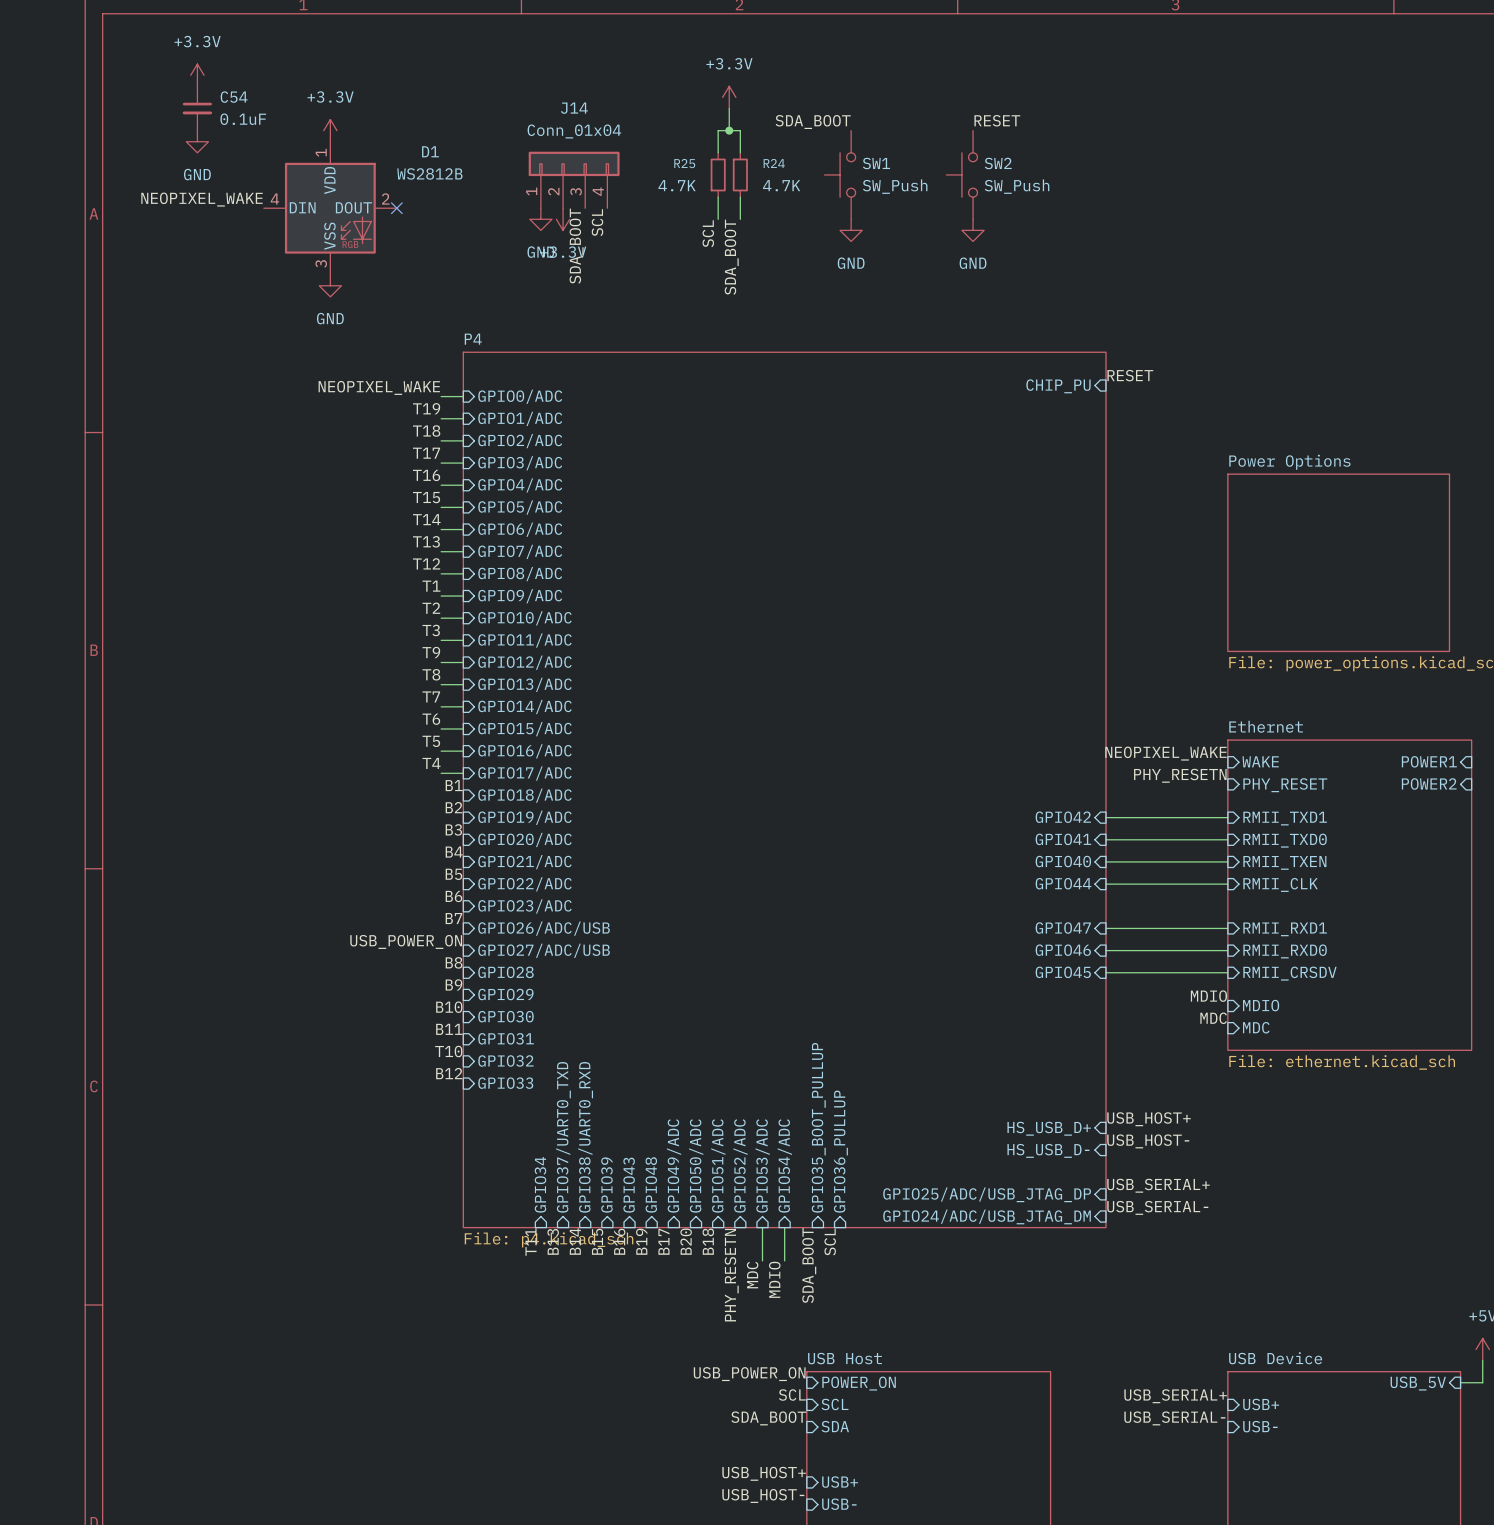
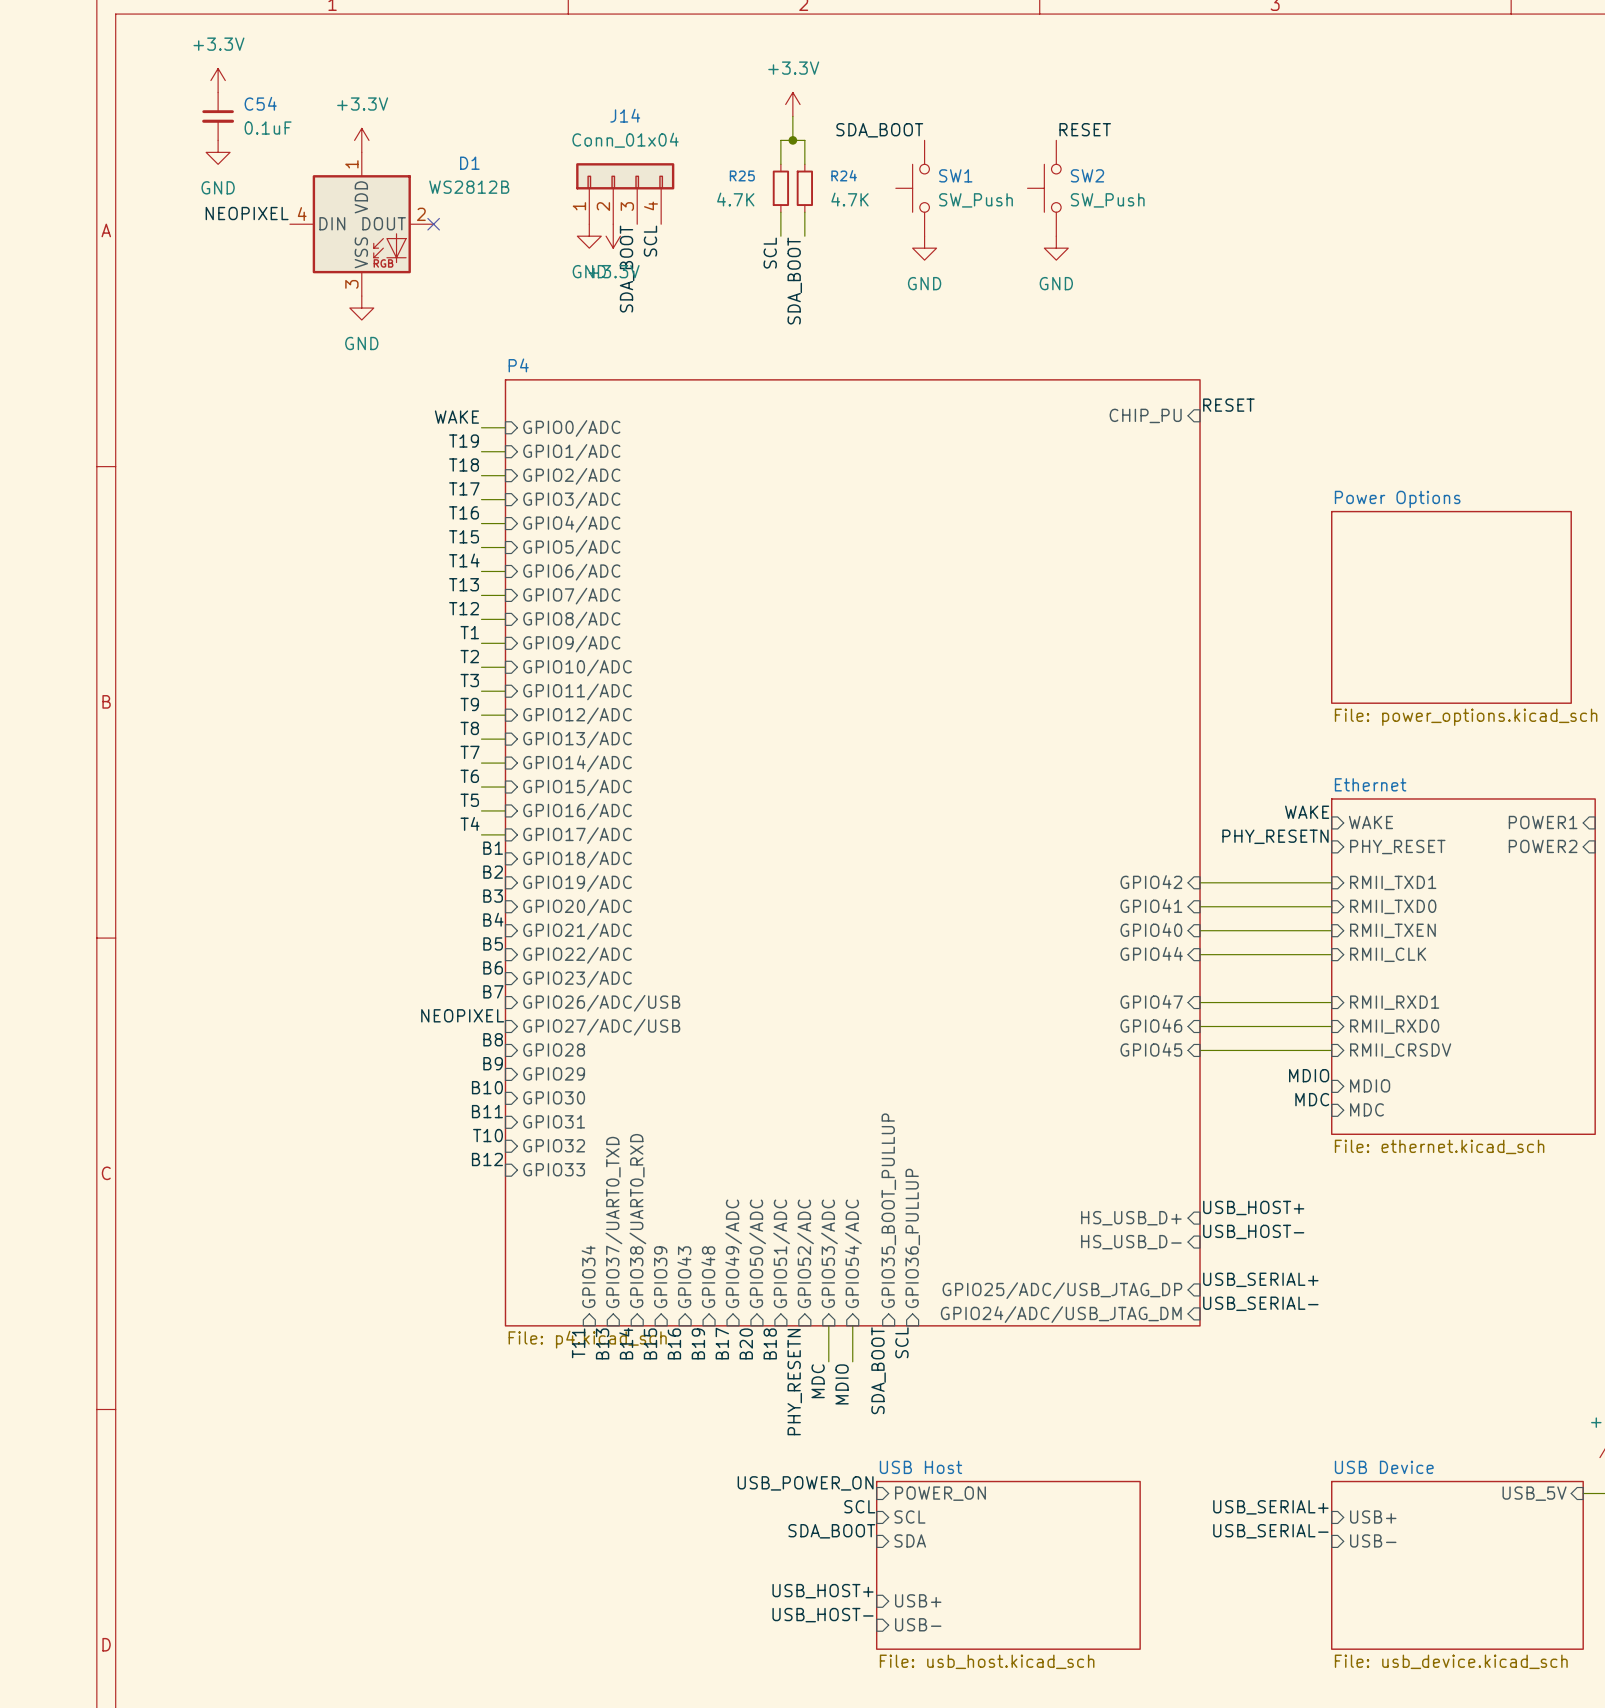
label: NEOPIXEL_WAKE (201, 199) -> NEOPIXEL (247, 213)
label: NEOPIXEL_WAKE (379, 387) -> WAKE (456, 417)
label: NEOPIXEL_WAKE (1165, 753) -> WAKE (1307, 812)
label: USB_POWER_ON (406, 941) -> NEOPIXEL (462, 1015)

